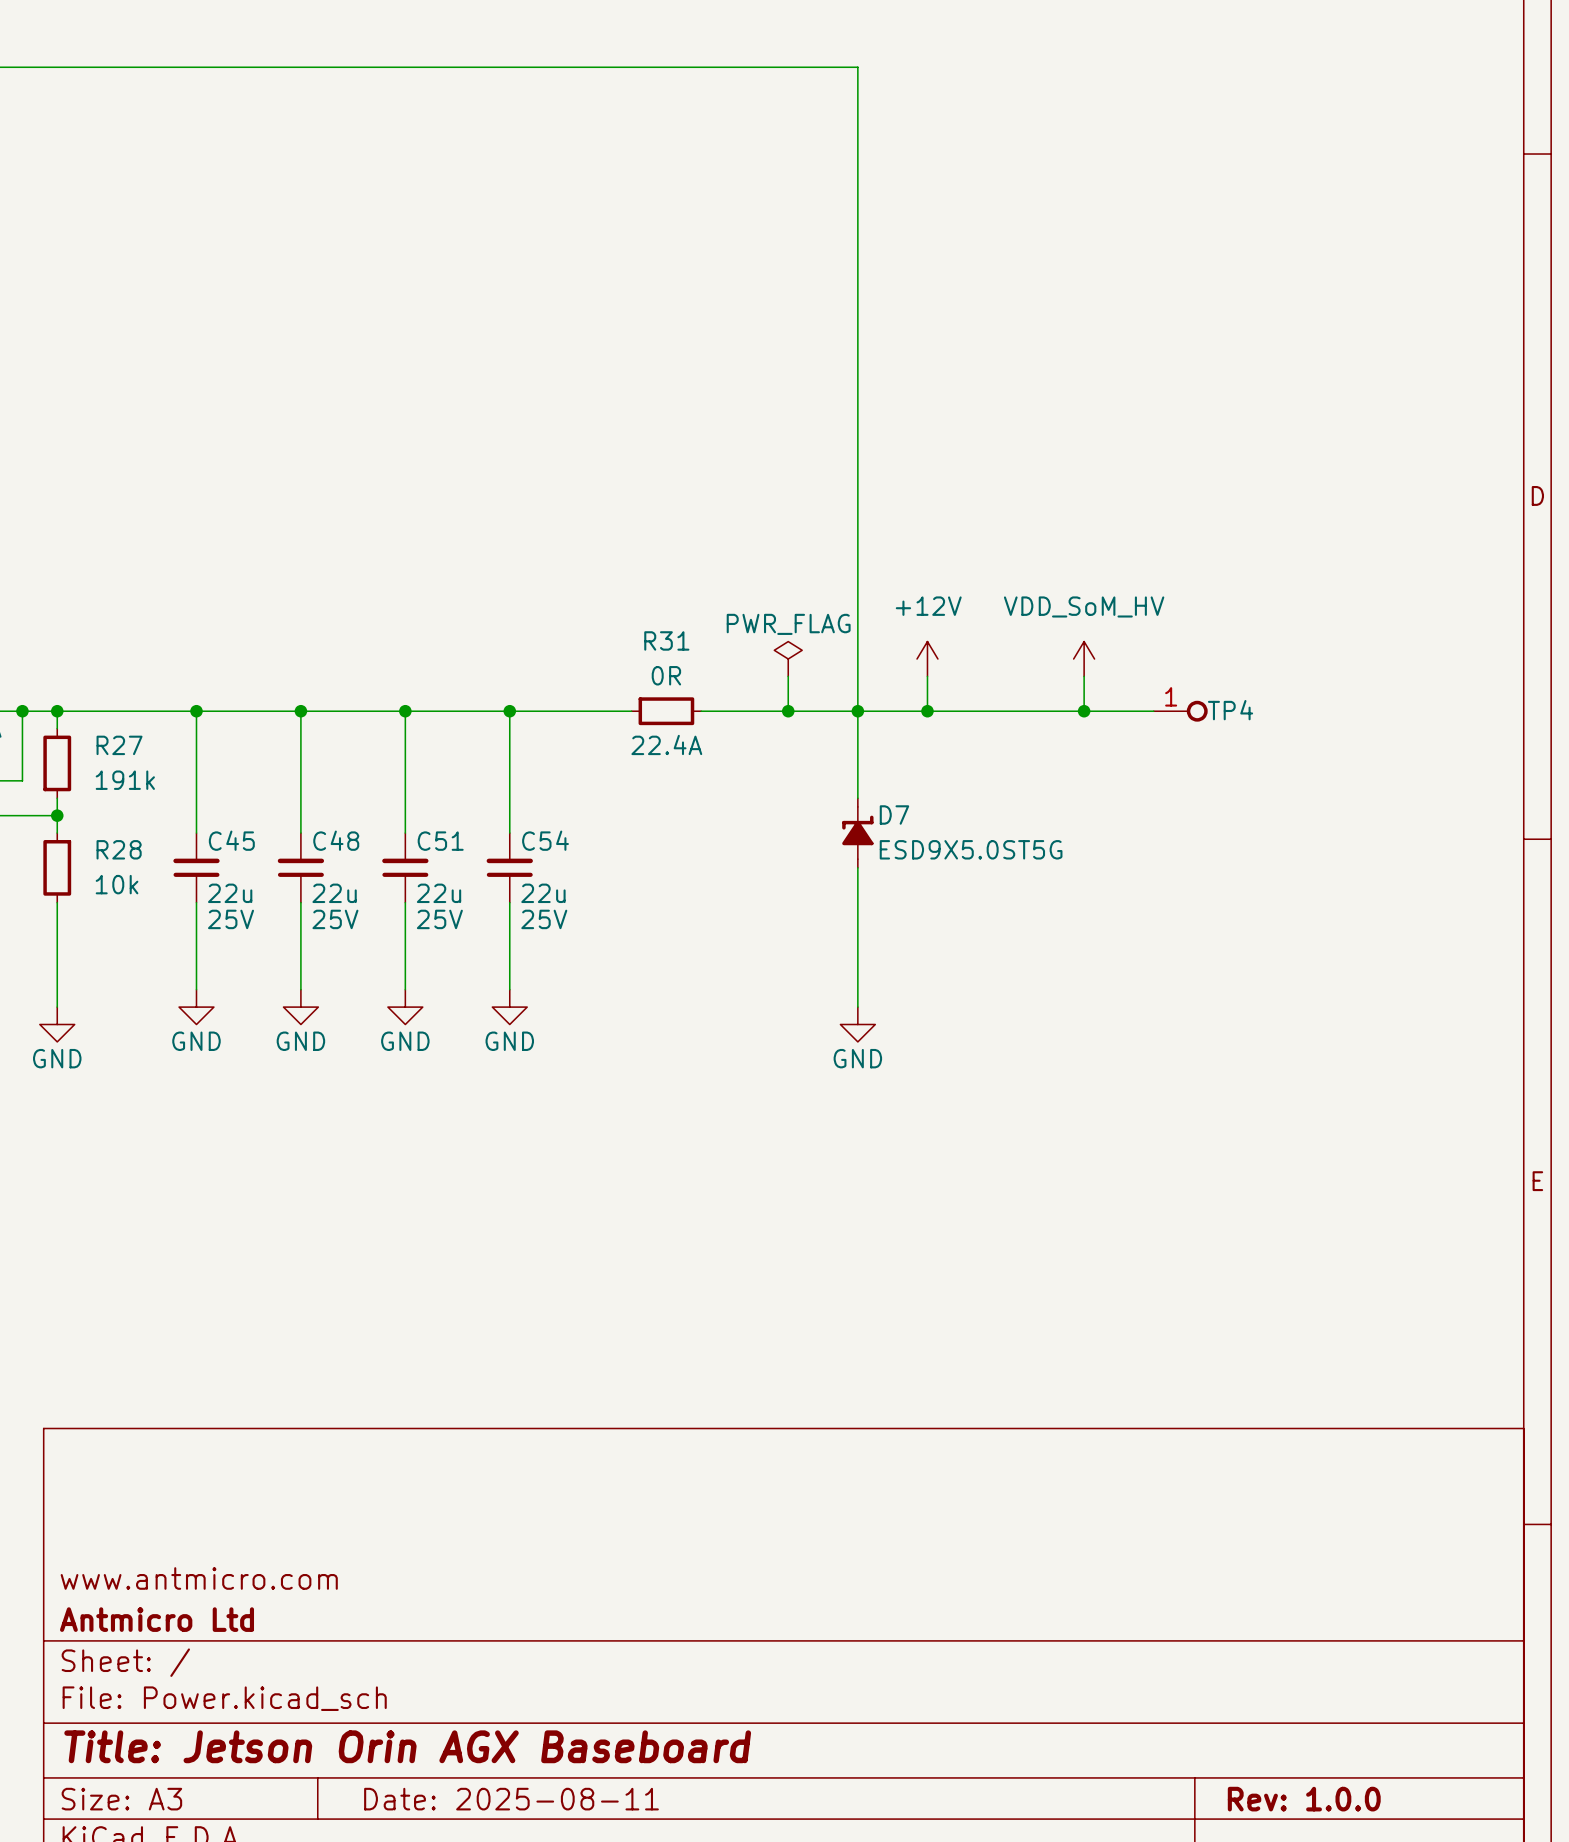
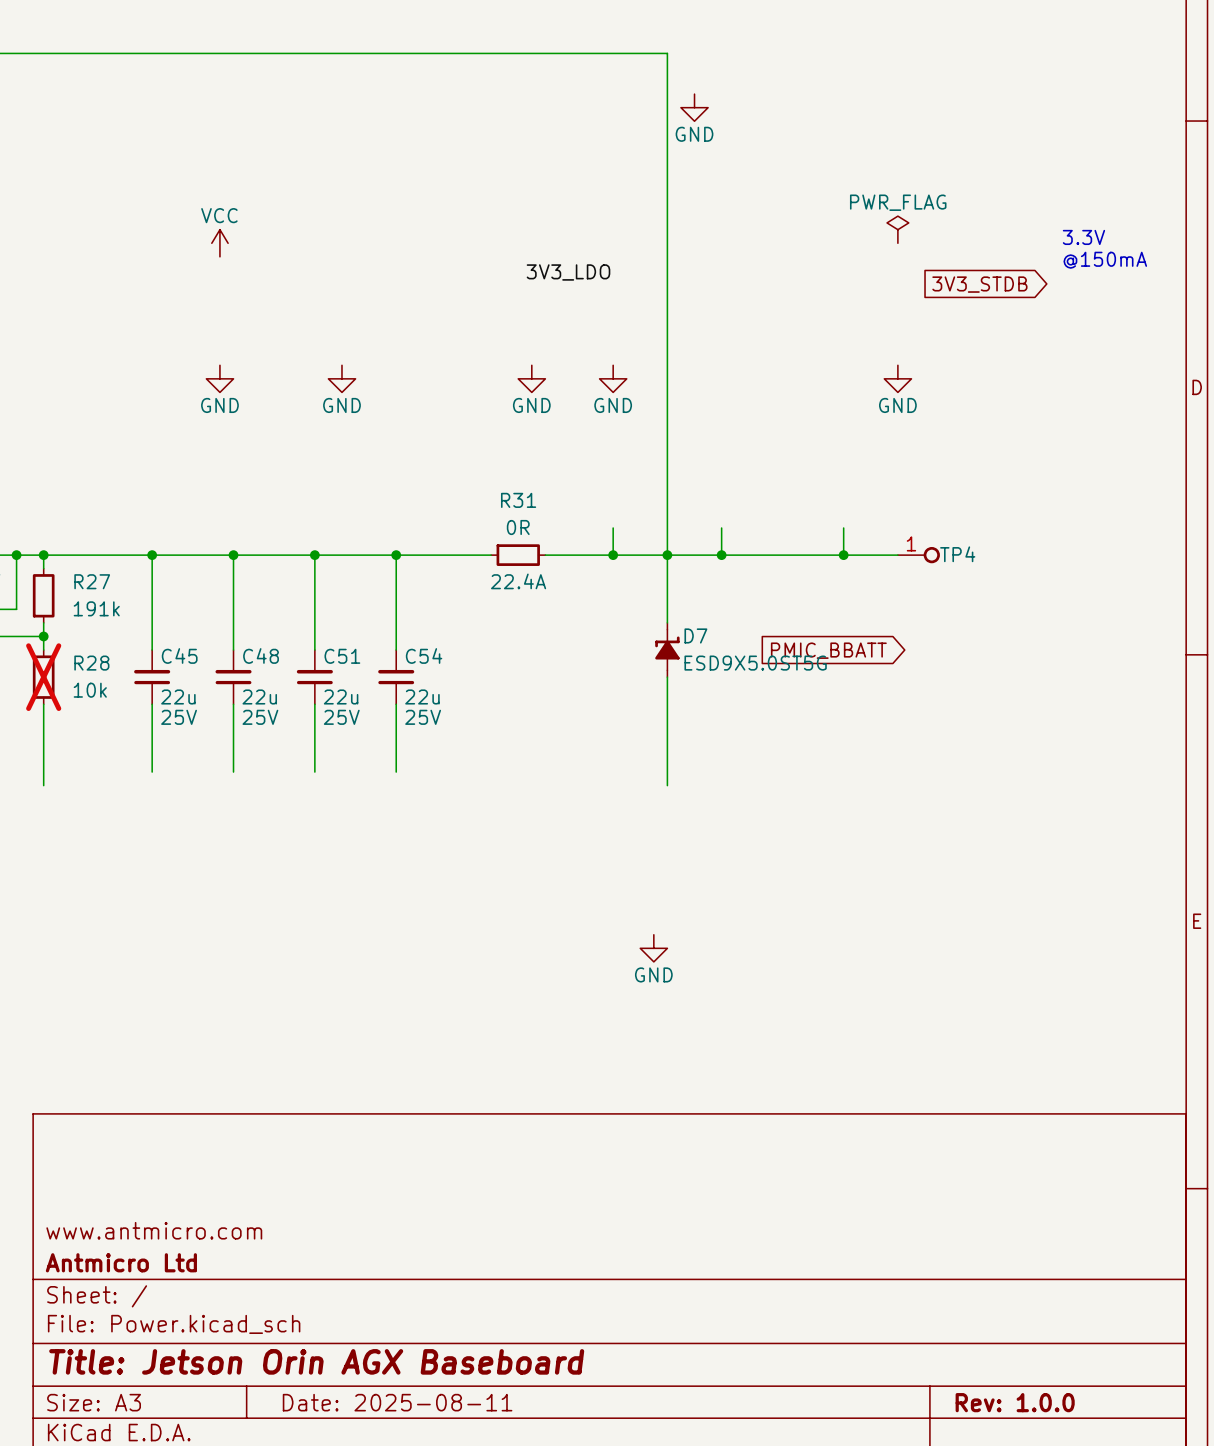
power symbol: none -> GND (694, 107)
power symbol: none -> PWR_FLAG (897, 229)
text: none -> 3.3V (1083, 237)
power symbol: none -> VCC (219, 243)
text: none -> @150mA (1105, 260)
label: none -> 3V3_LDO (568, 272)
global label: none -> 3V3_STDB (979, 284)
power symbol: none -> GND (219, 378)
power symbol: none -> GND (341, 378)
power symbol: none -> GND (531, 378)
power symbol: none -> GND (613, 378)
power symbol: none -> GND (897, 378)
power symbol: PWR_FLAG (788, 659) -> none
power symbol: +12V (927, 659) -> none
power symbol: VDD_SoM_HV (1084, 659) -> none
global label: none -> PMIC_BBATT (828, 650)
R28 do-not-place cross: none -> (43, 677)
power symbol: GND (196, 1007) -> none
power symbol: GND (300, 1007) -> none
power symbol: GND (405, 1007) -> none
power symbol: GND (509, 1007) -> none
power symbol: GND (57, 1024) -> none
power symbol position: GND (857, 1024) -> GND (653, 948)

